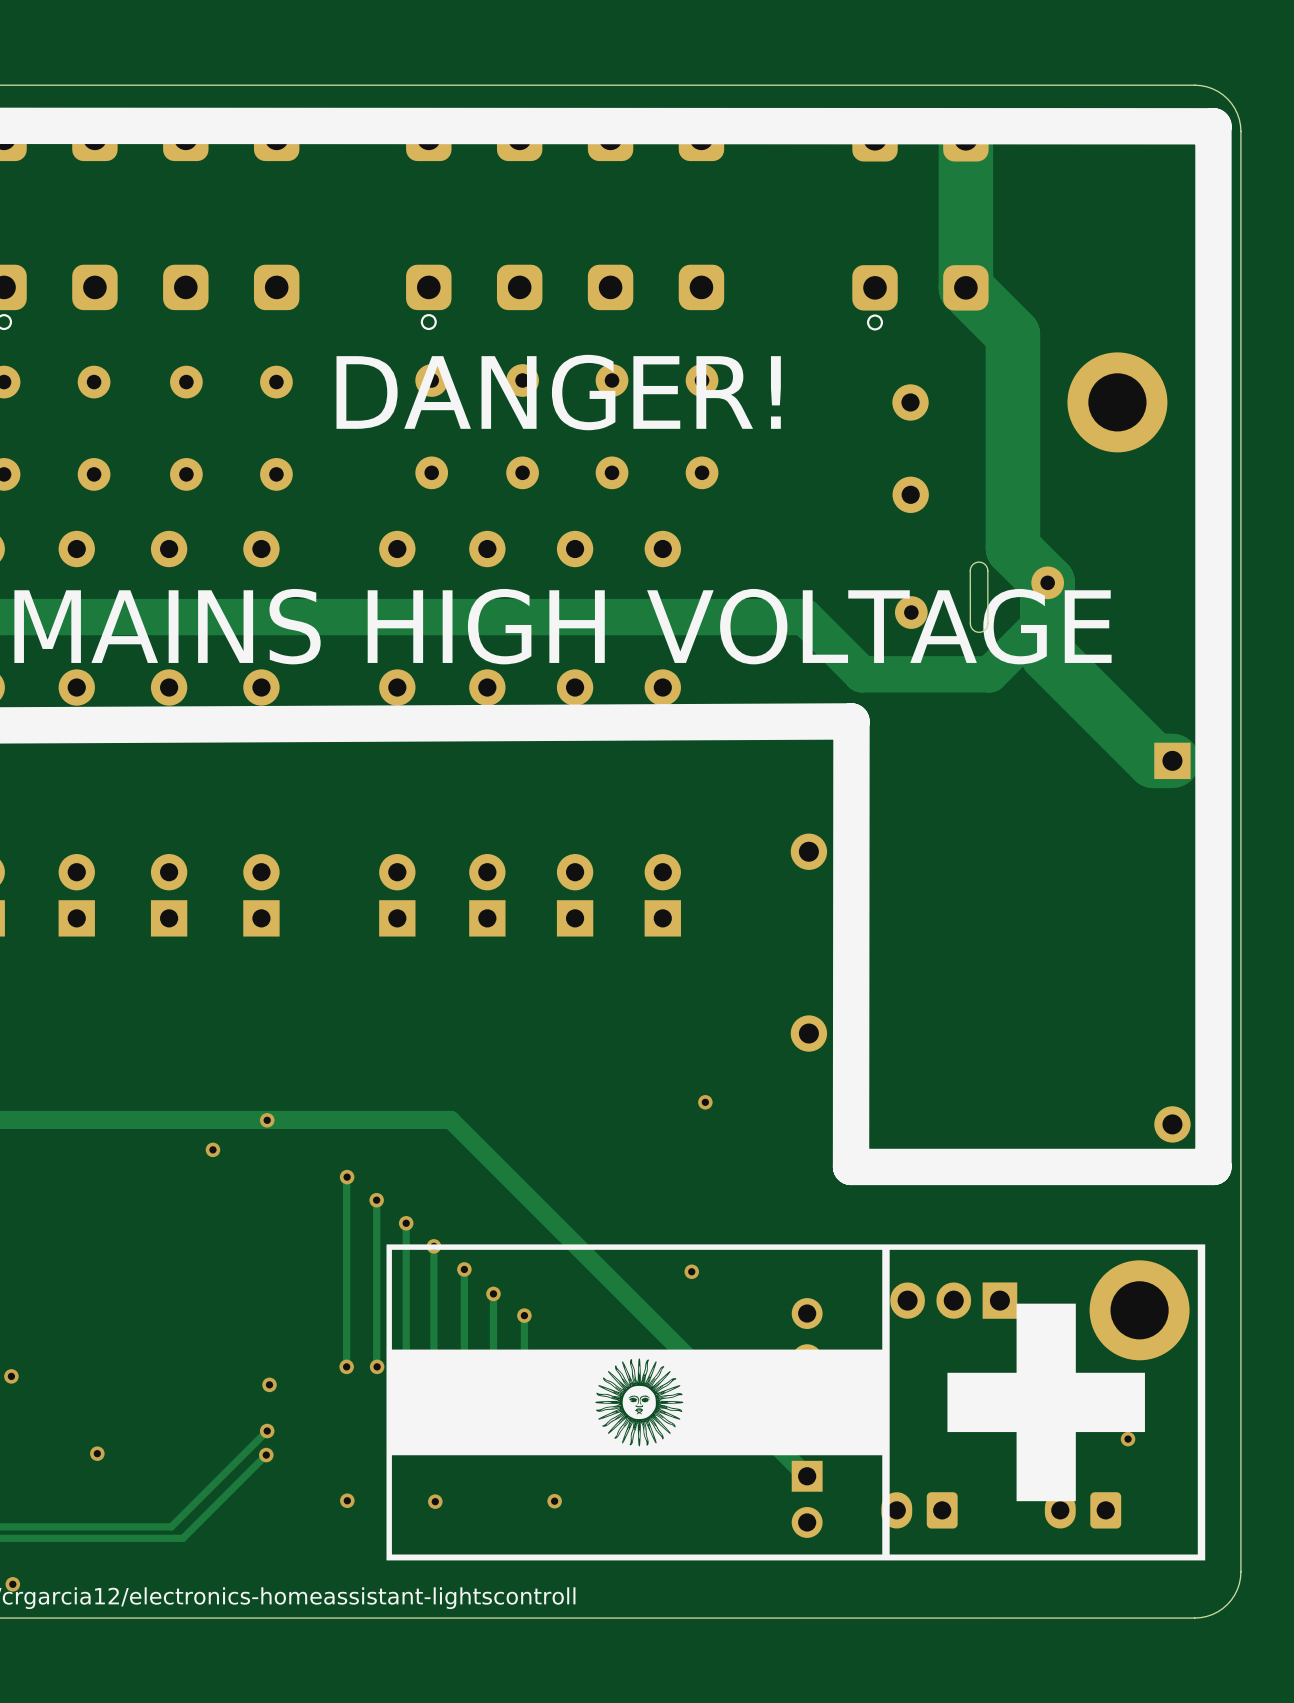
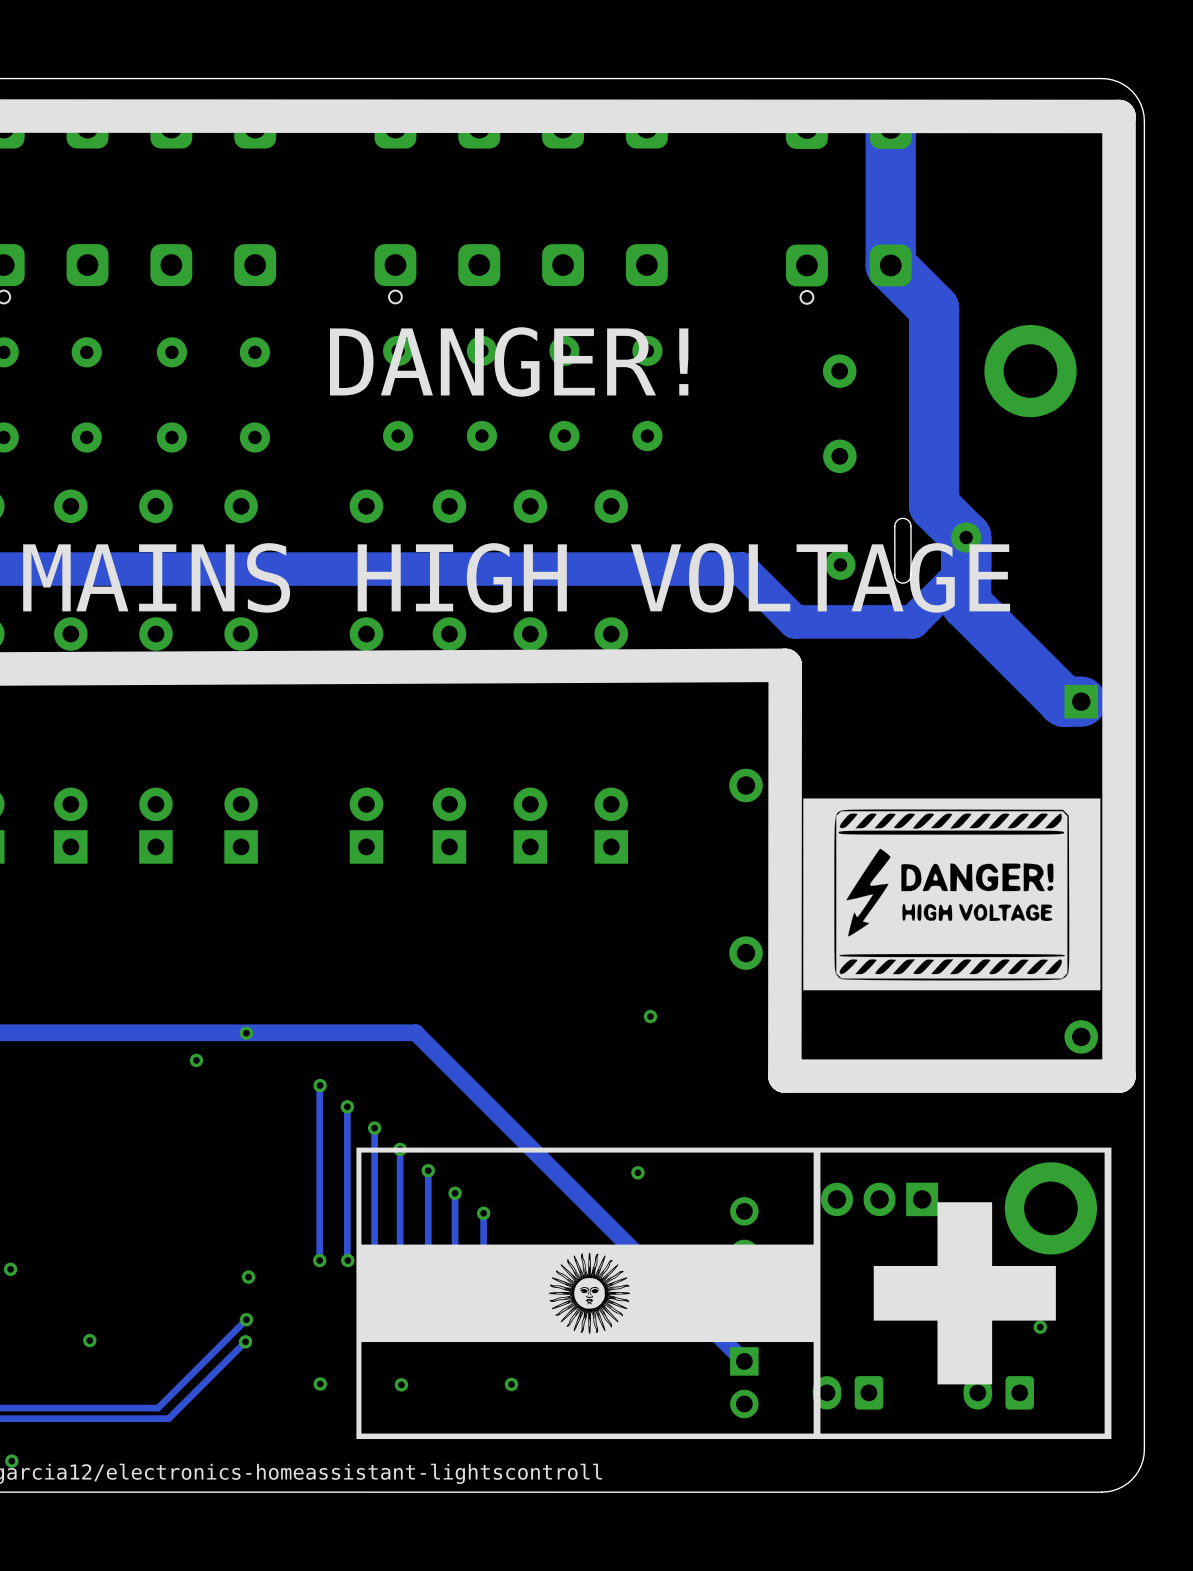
drawing: none -> [803, 798, 1101, 991]

